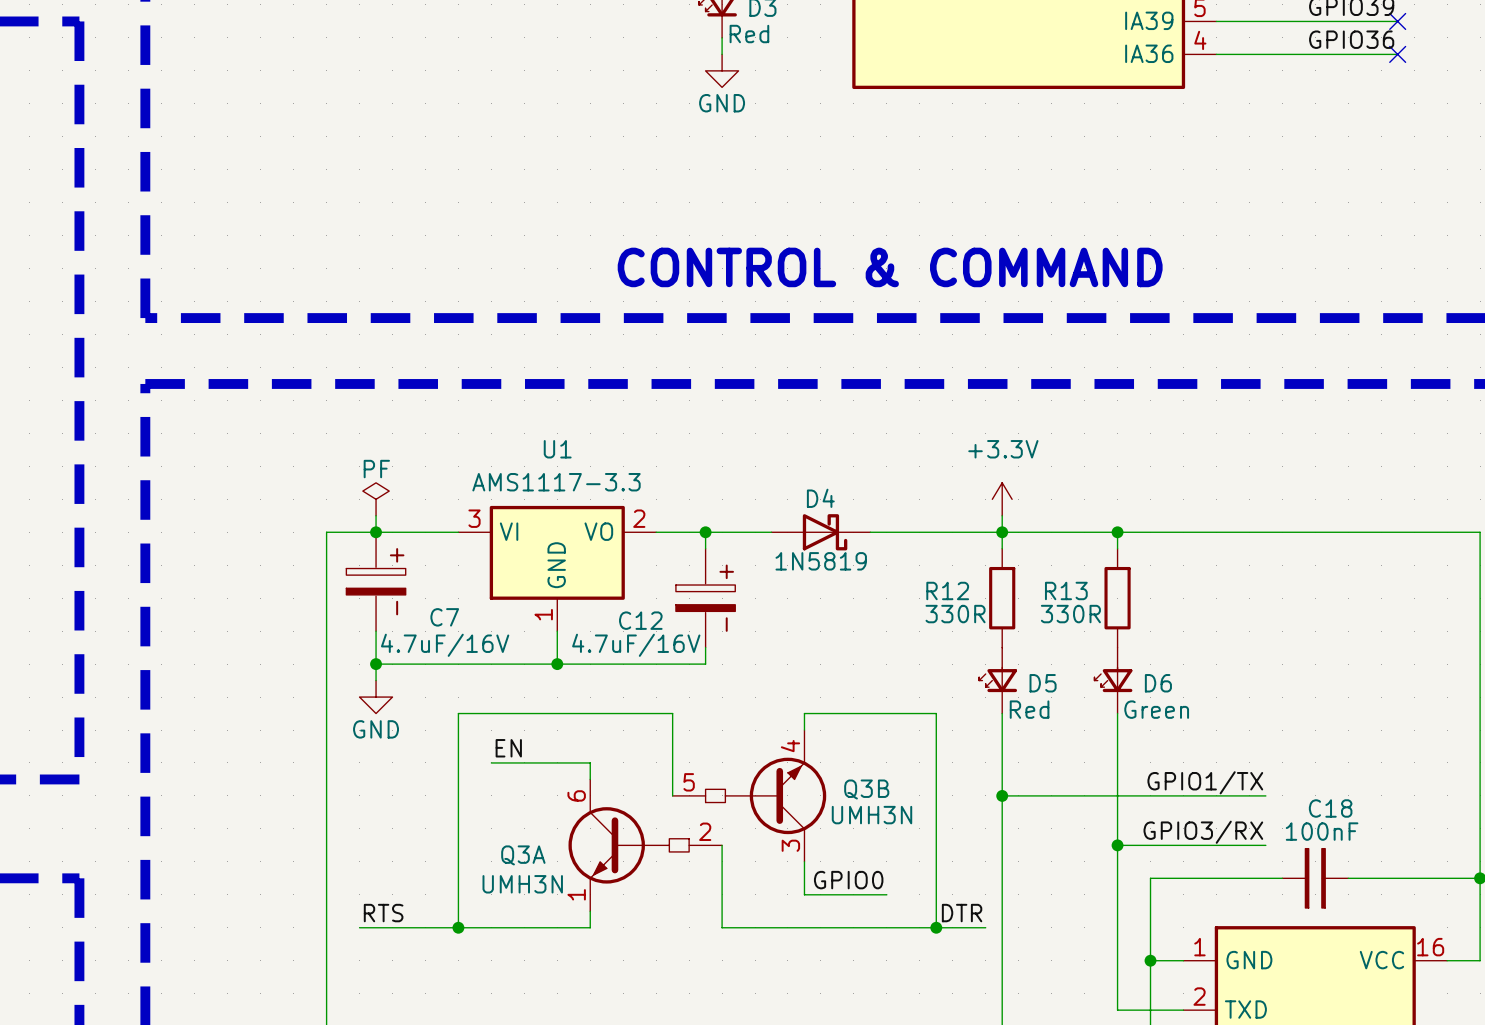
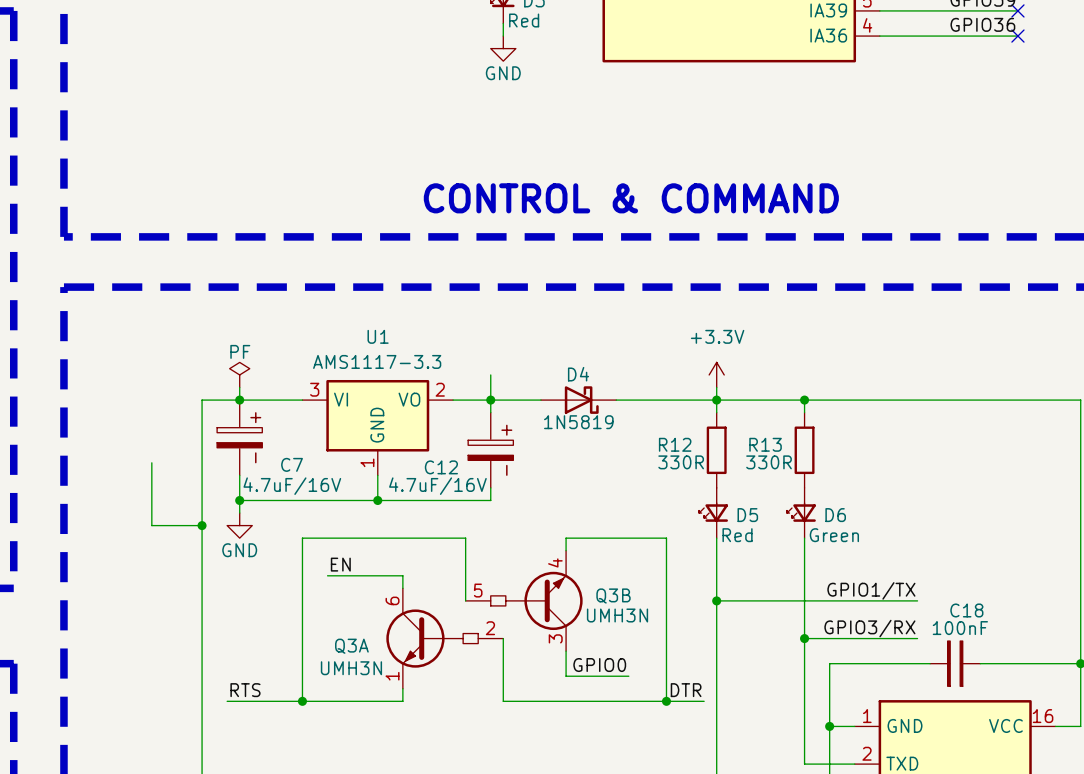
wire: none -> (490, 374) (490, 400)
wire: none -> (151, 462) (151, 525) (202, 525)
junction: none -> (202, 525)

